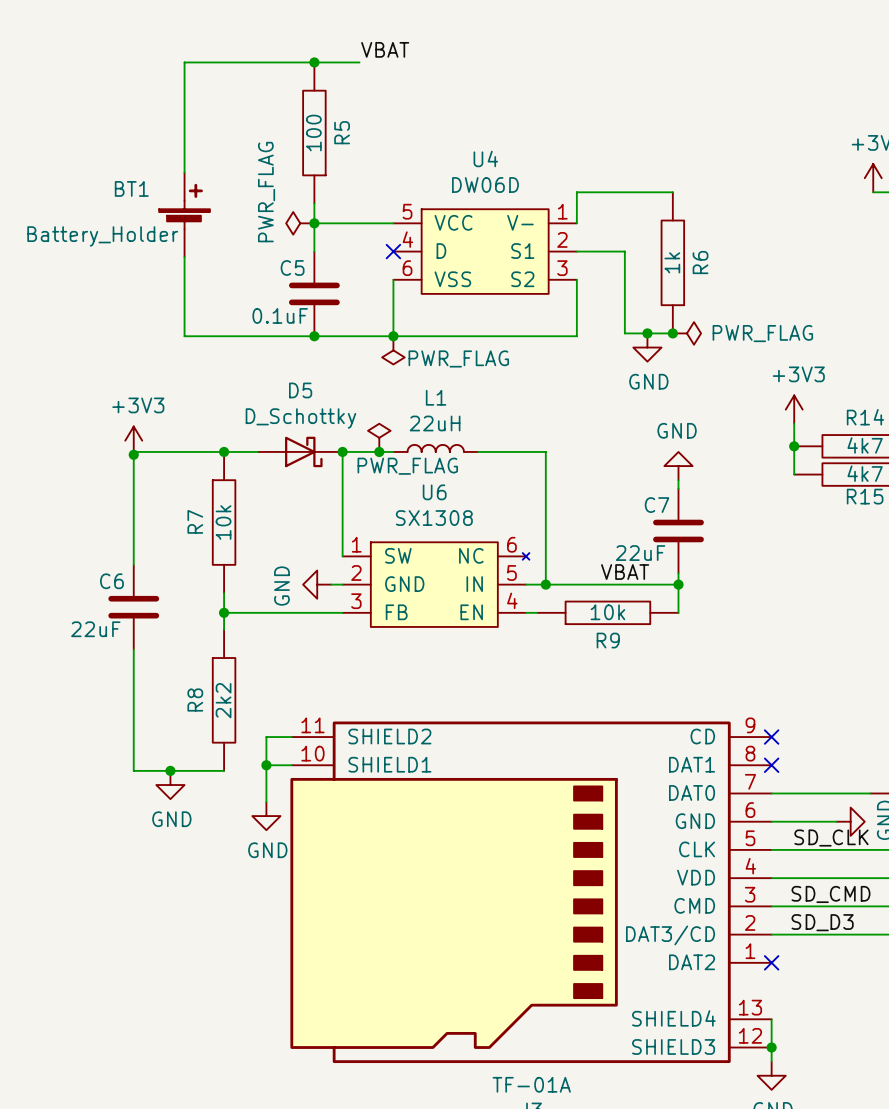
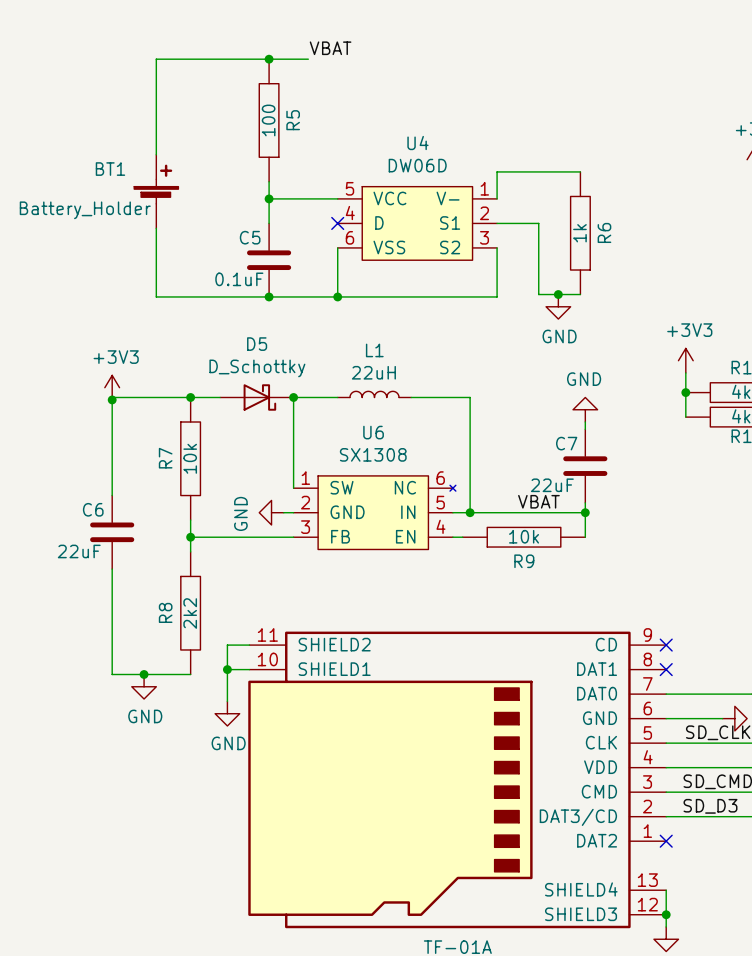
power symbol: PWR_FLAG (300, 223) -> none
junction: (672, 333) -> none
power symbol: PWR_FLAG (686, 333) -> none
power symbol: PWR_FLAG (393, 350) -> none
power symbol: PWR_FLAG (379, 437) -> none
junction: (379, 451) -> none

